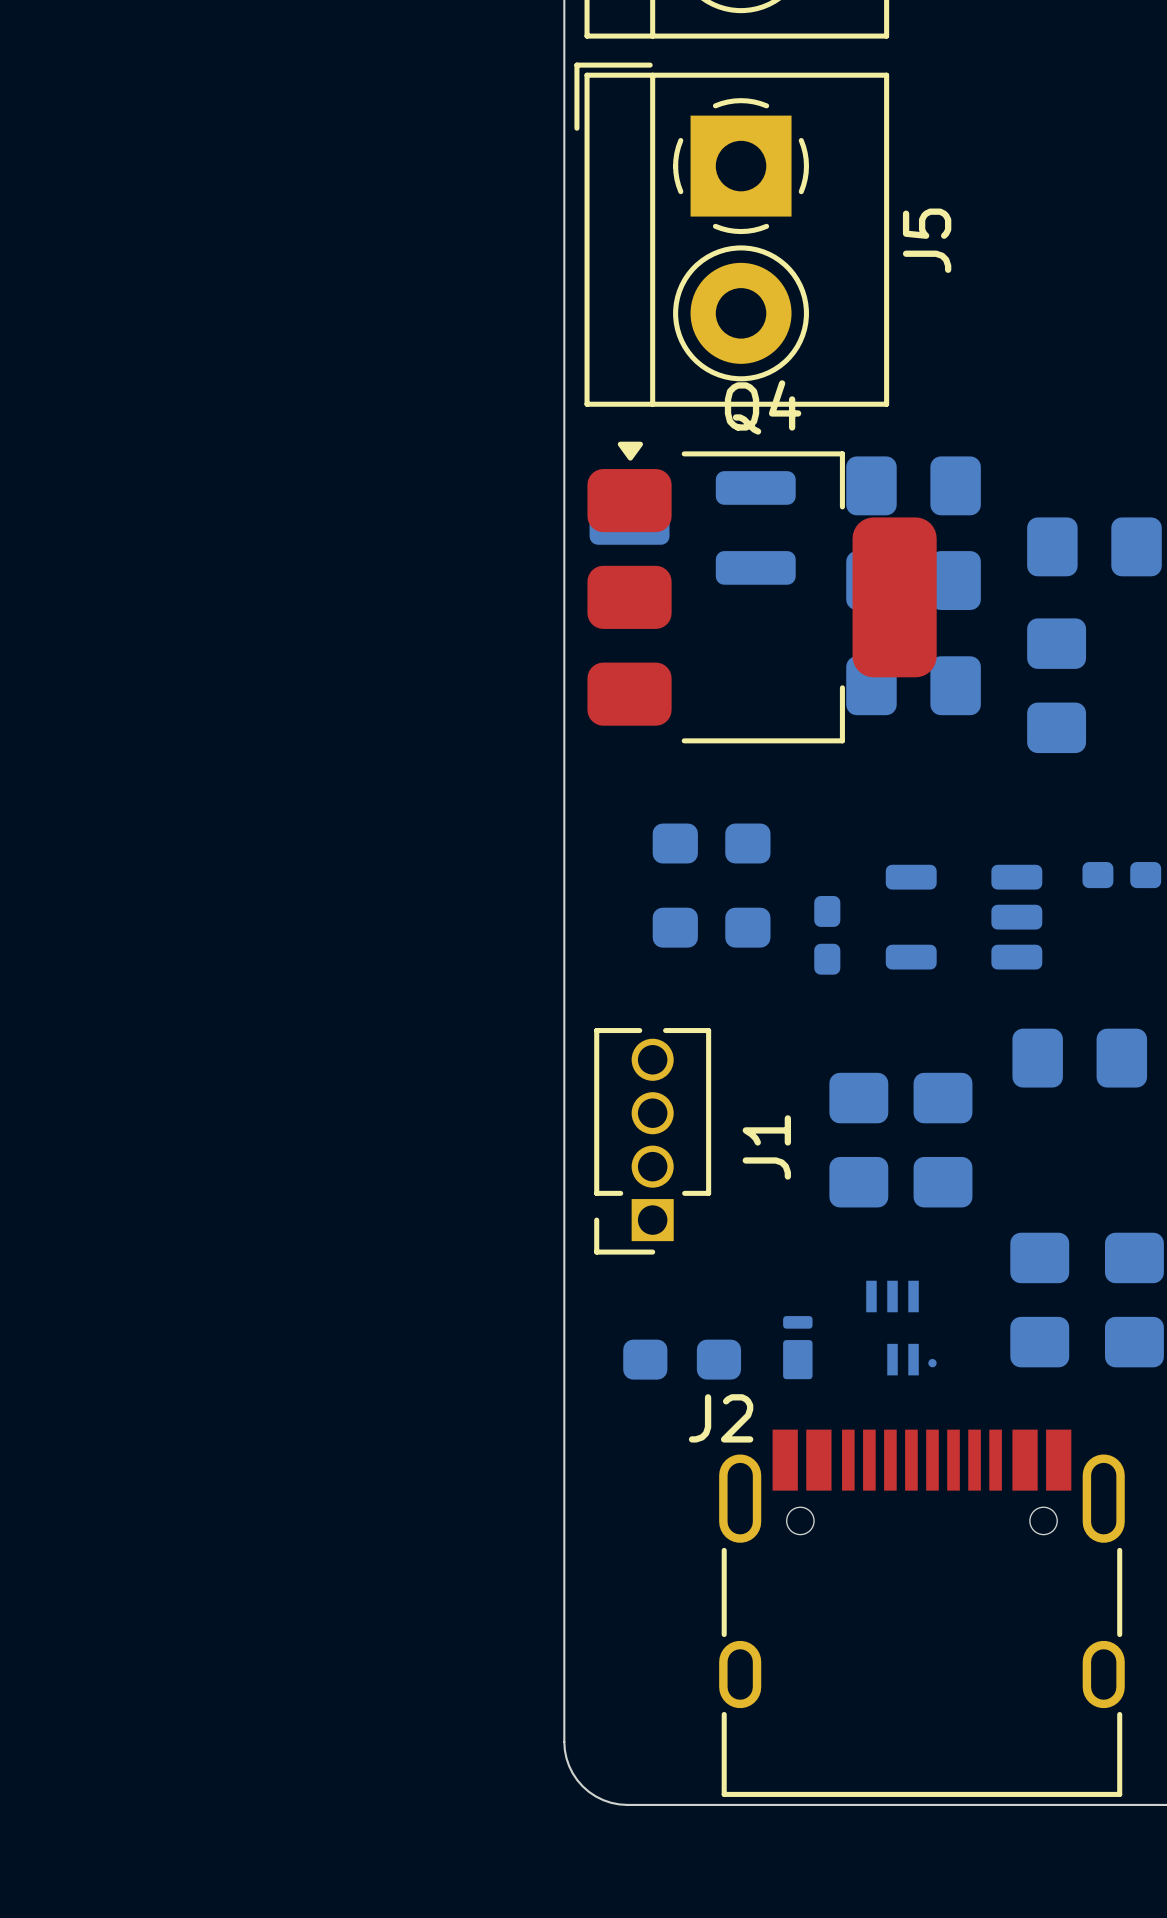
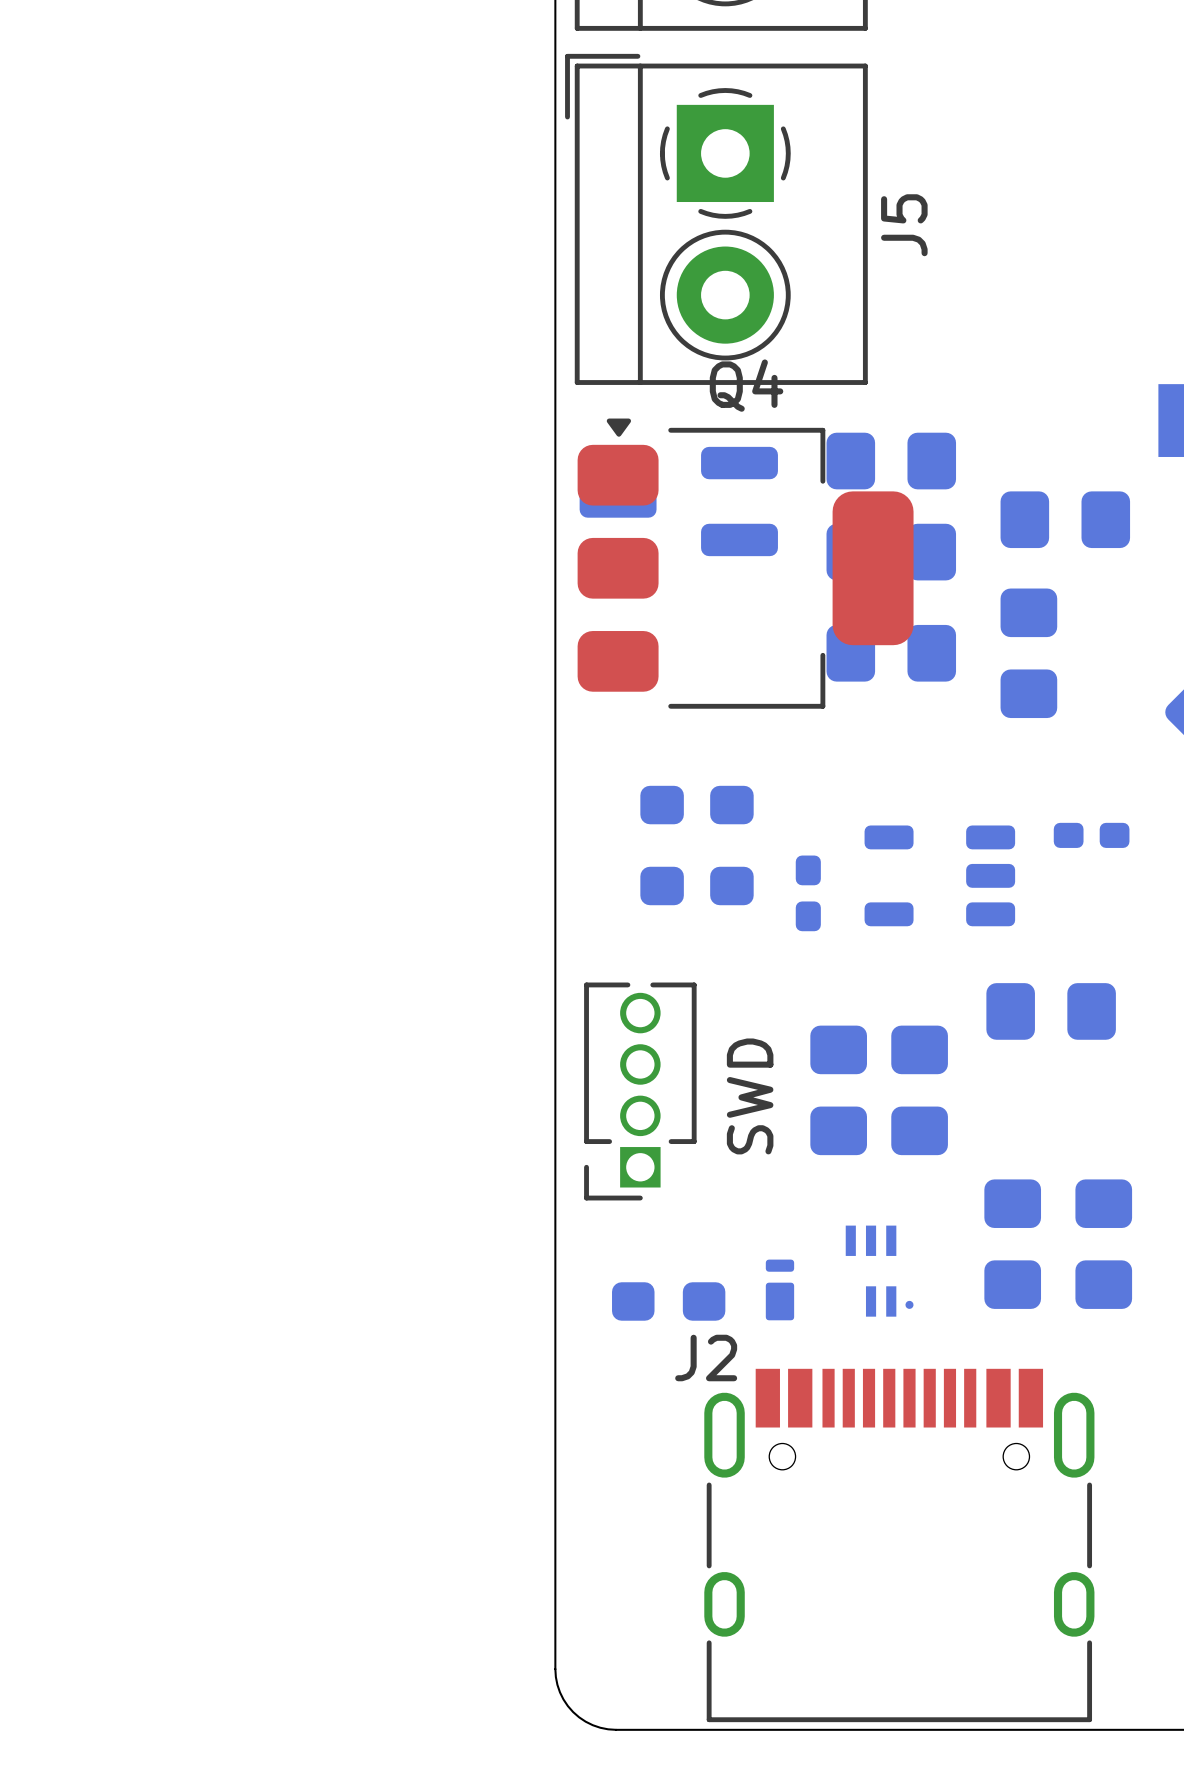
J1 name: J1 (766, 1147) -> SWD (750, 1096)

